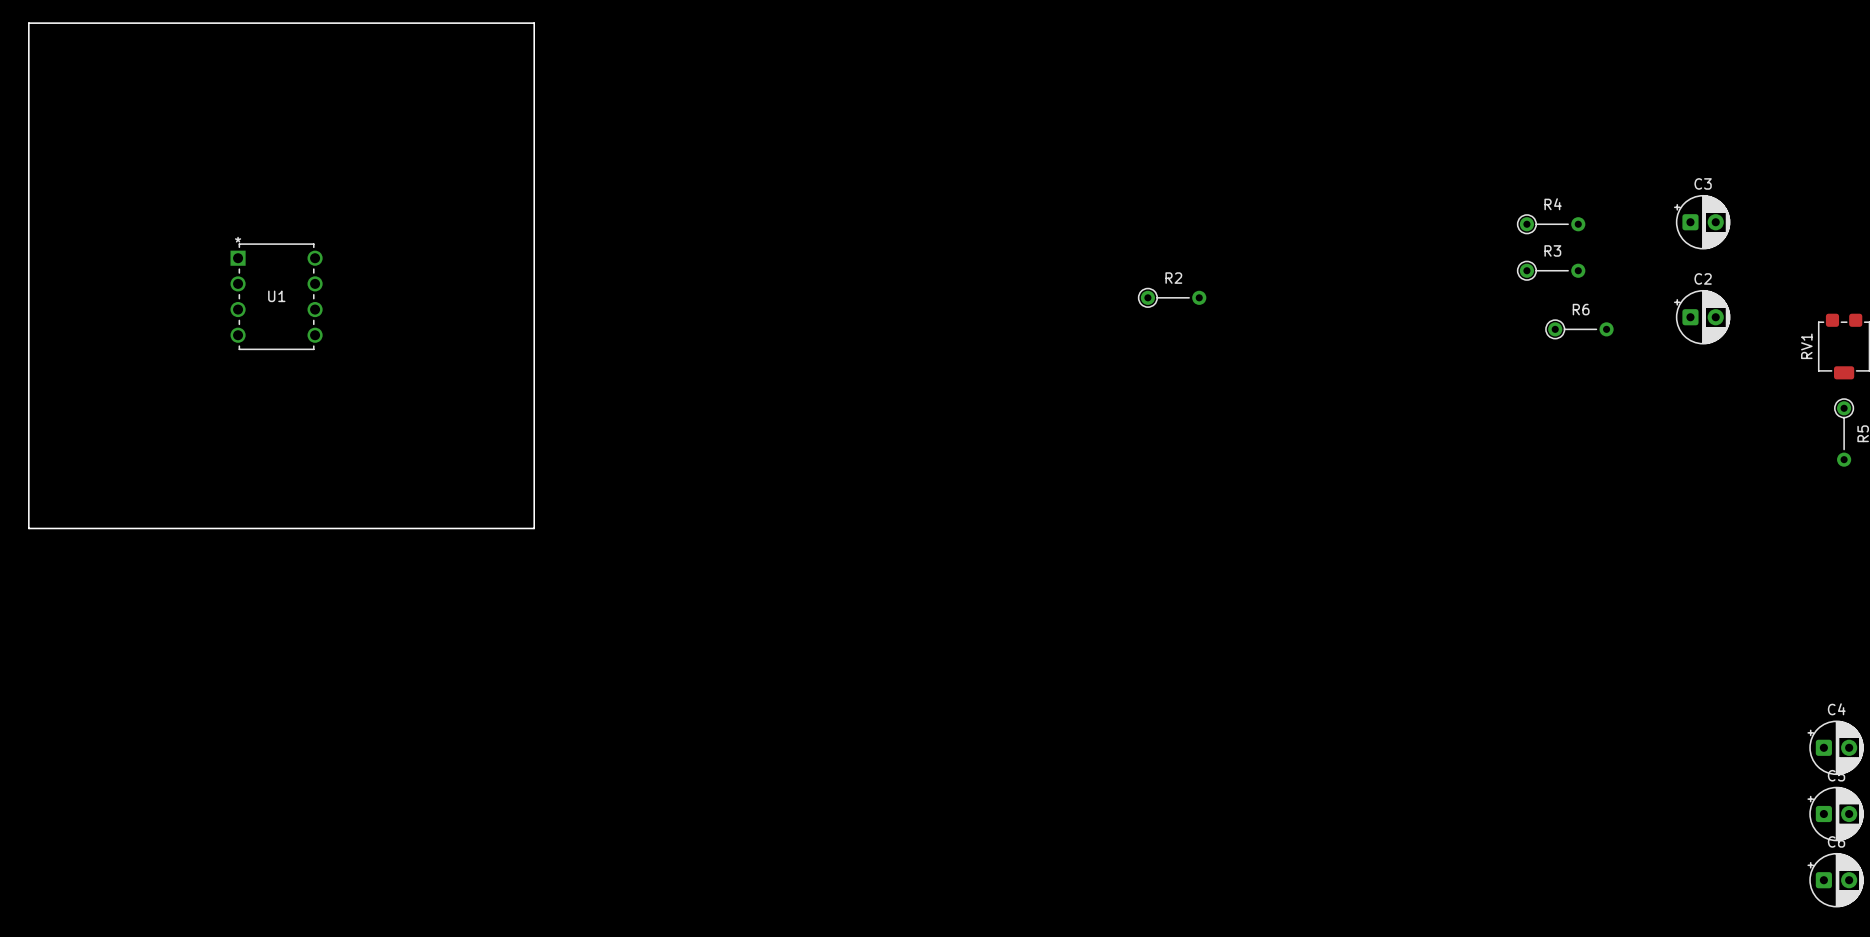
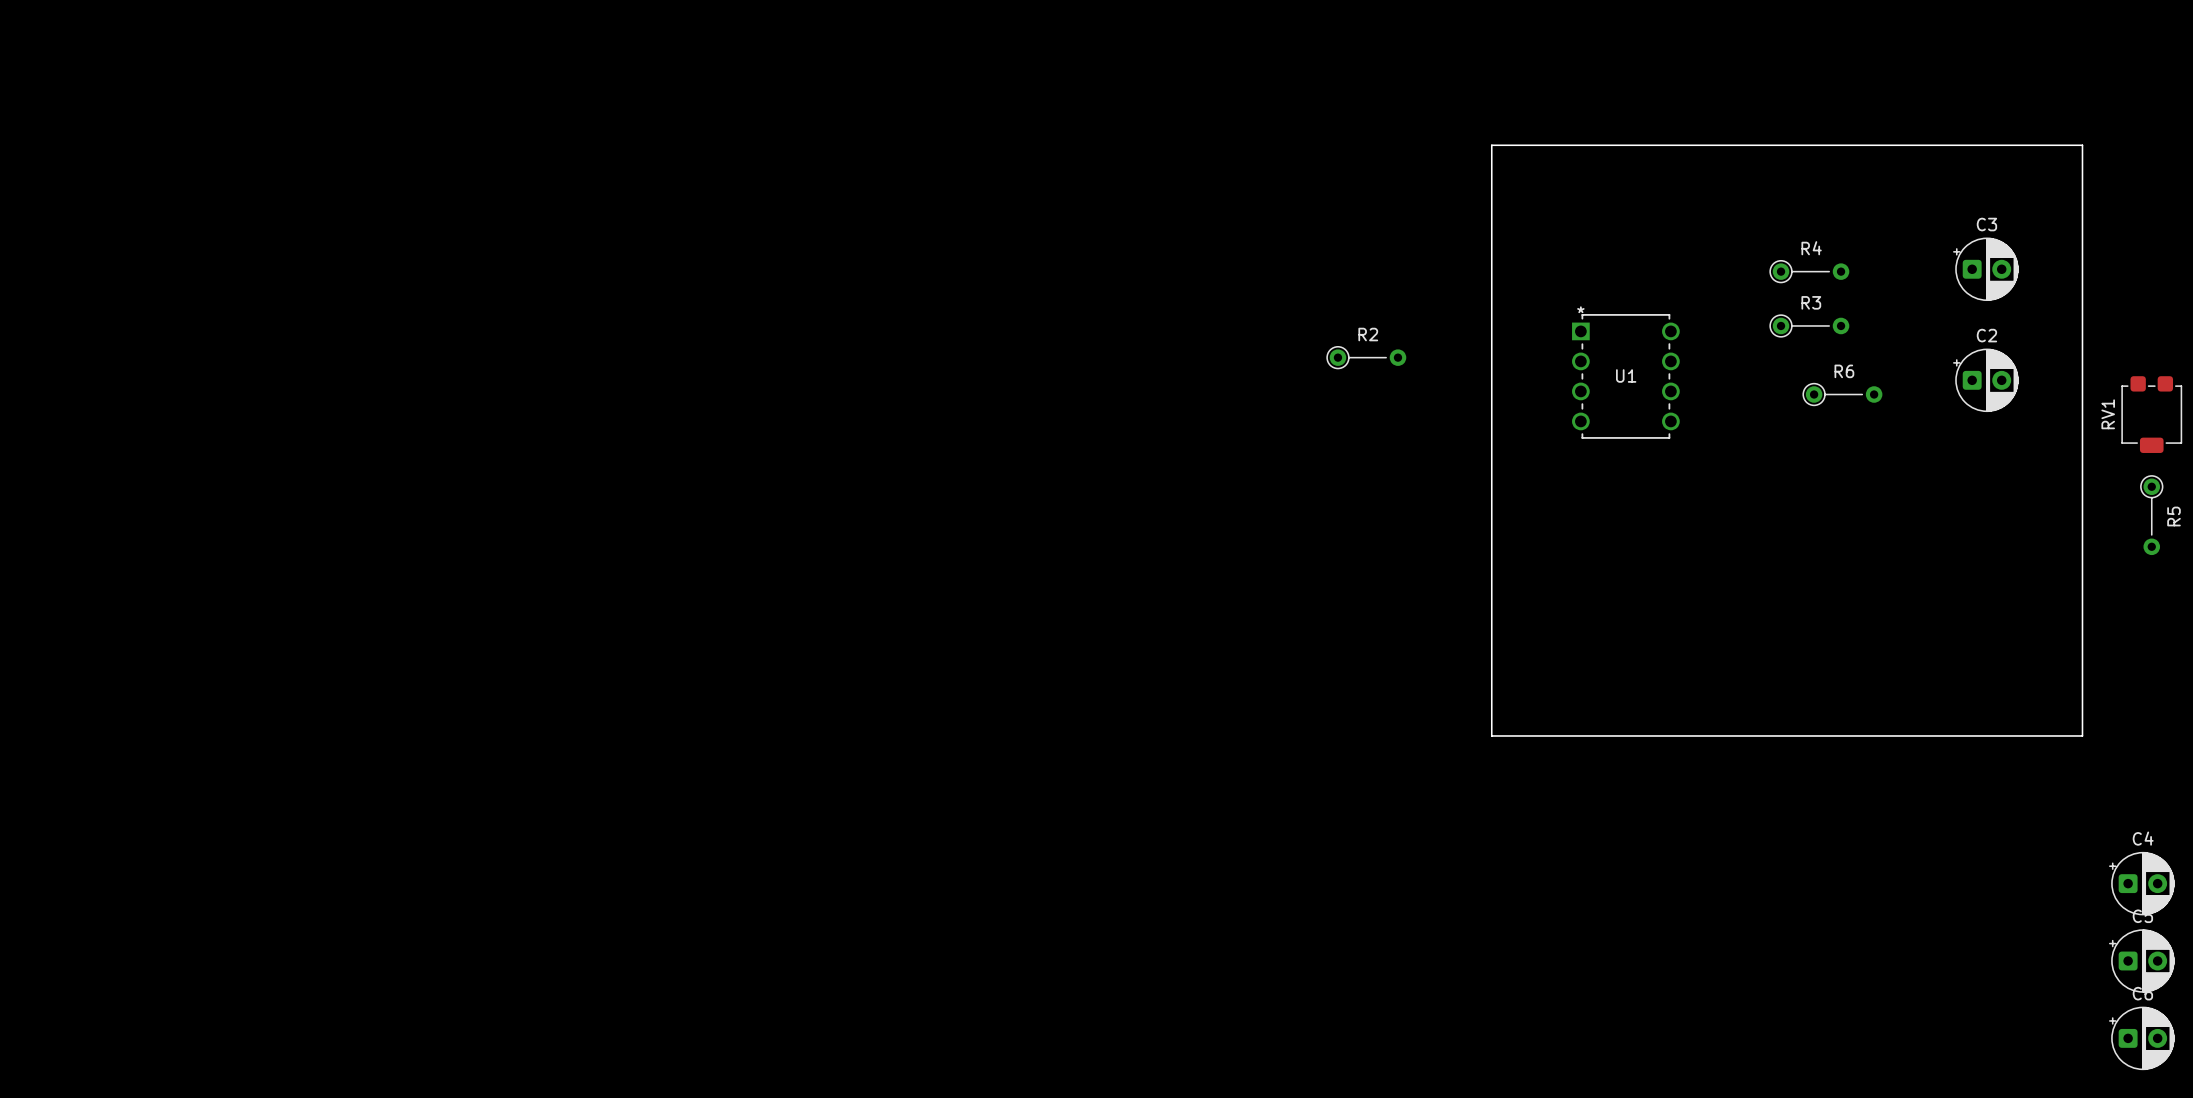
board edge: (28, 23) (534, 23) (534, 528) (28, 528) (28, 23) -> none
board edge: none -> (1491, 145) (2082, 145) (2082, 735) (1491, 735) (1491, 145)
U1 position: (276, 296) -> (1625, 376)

